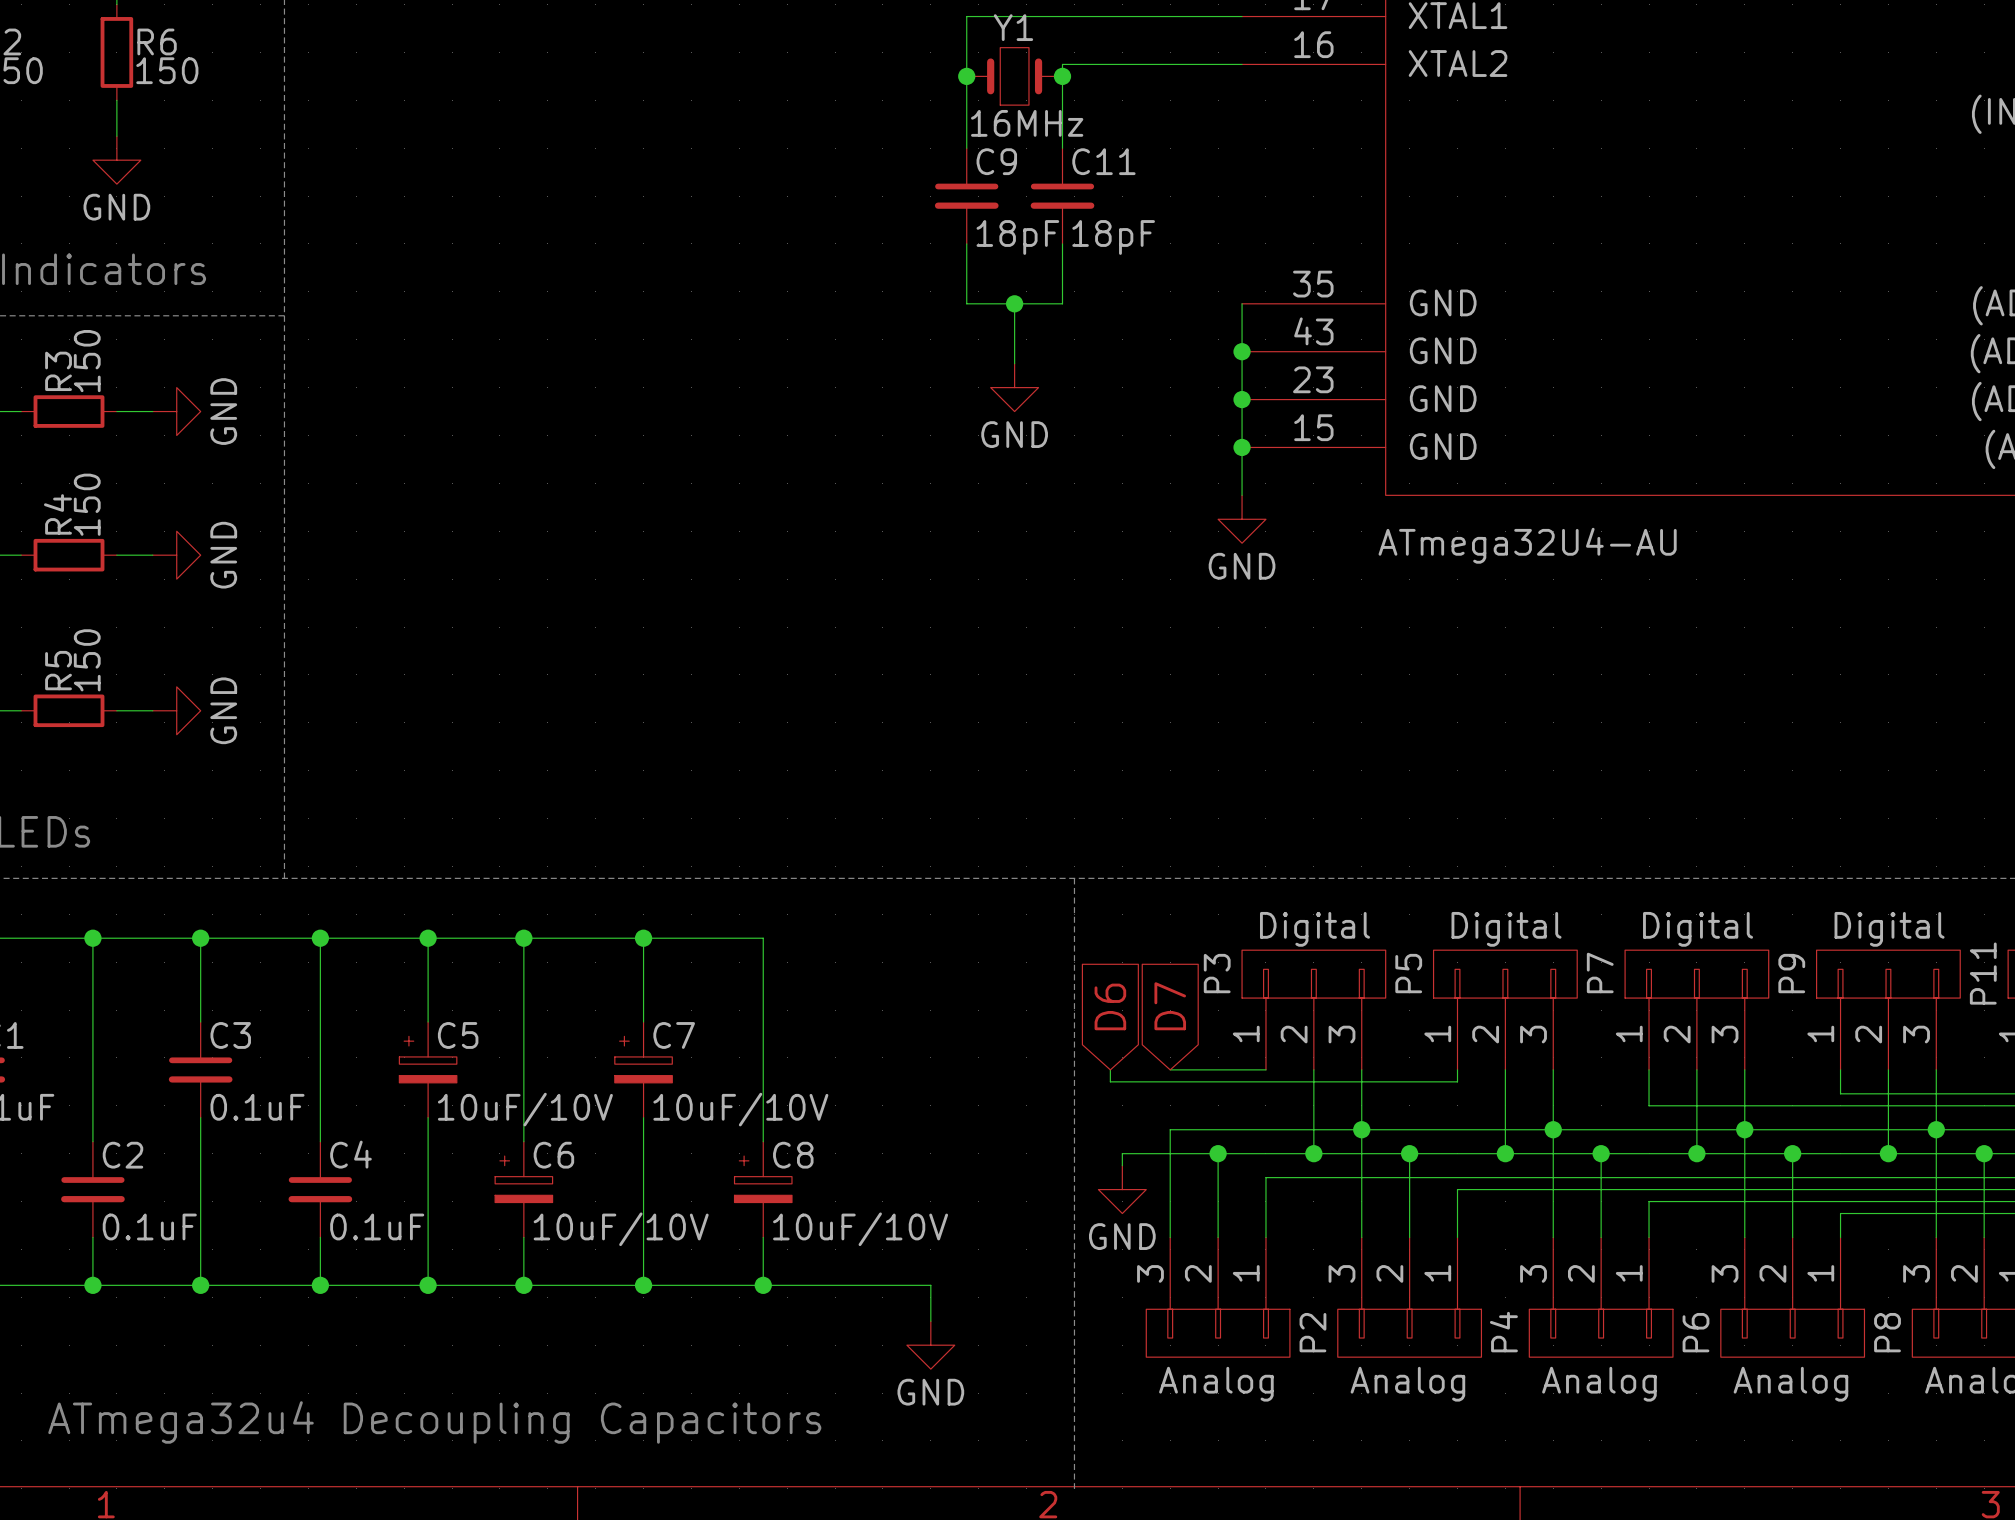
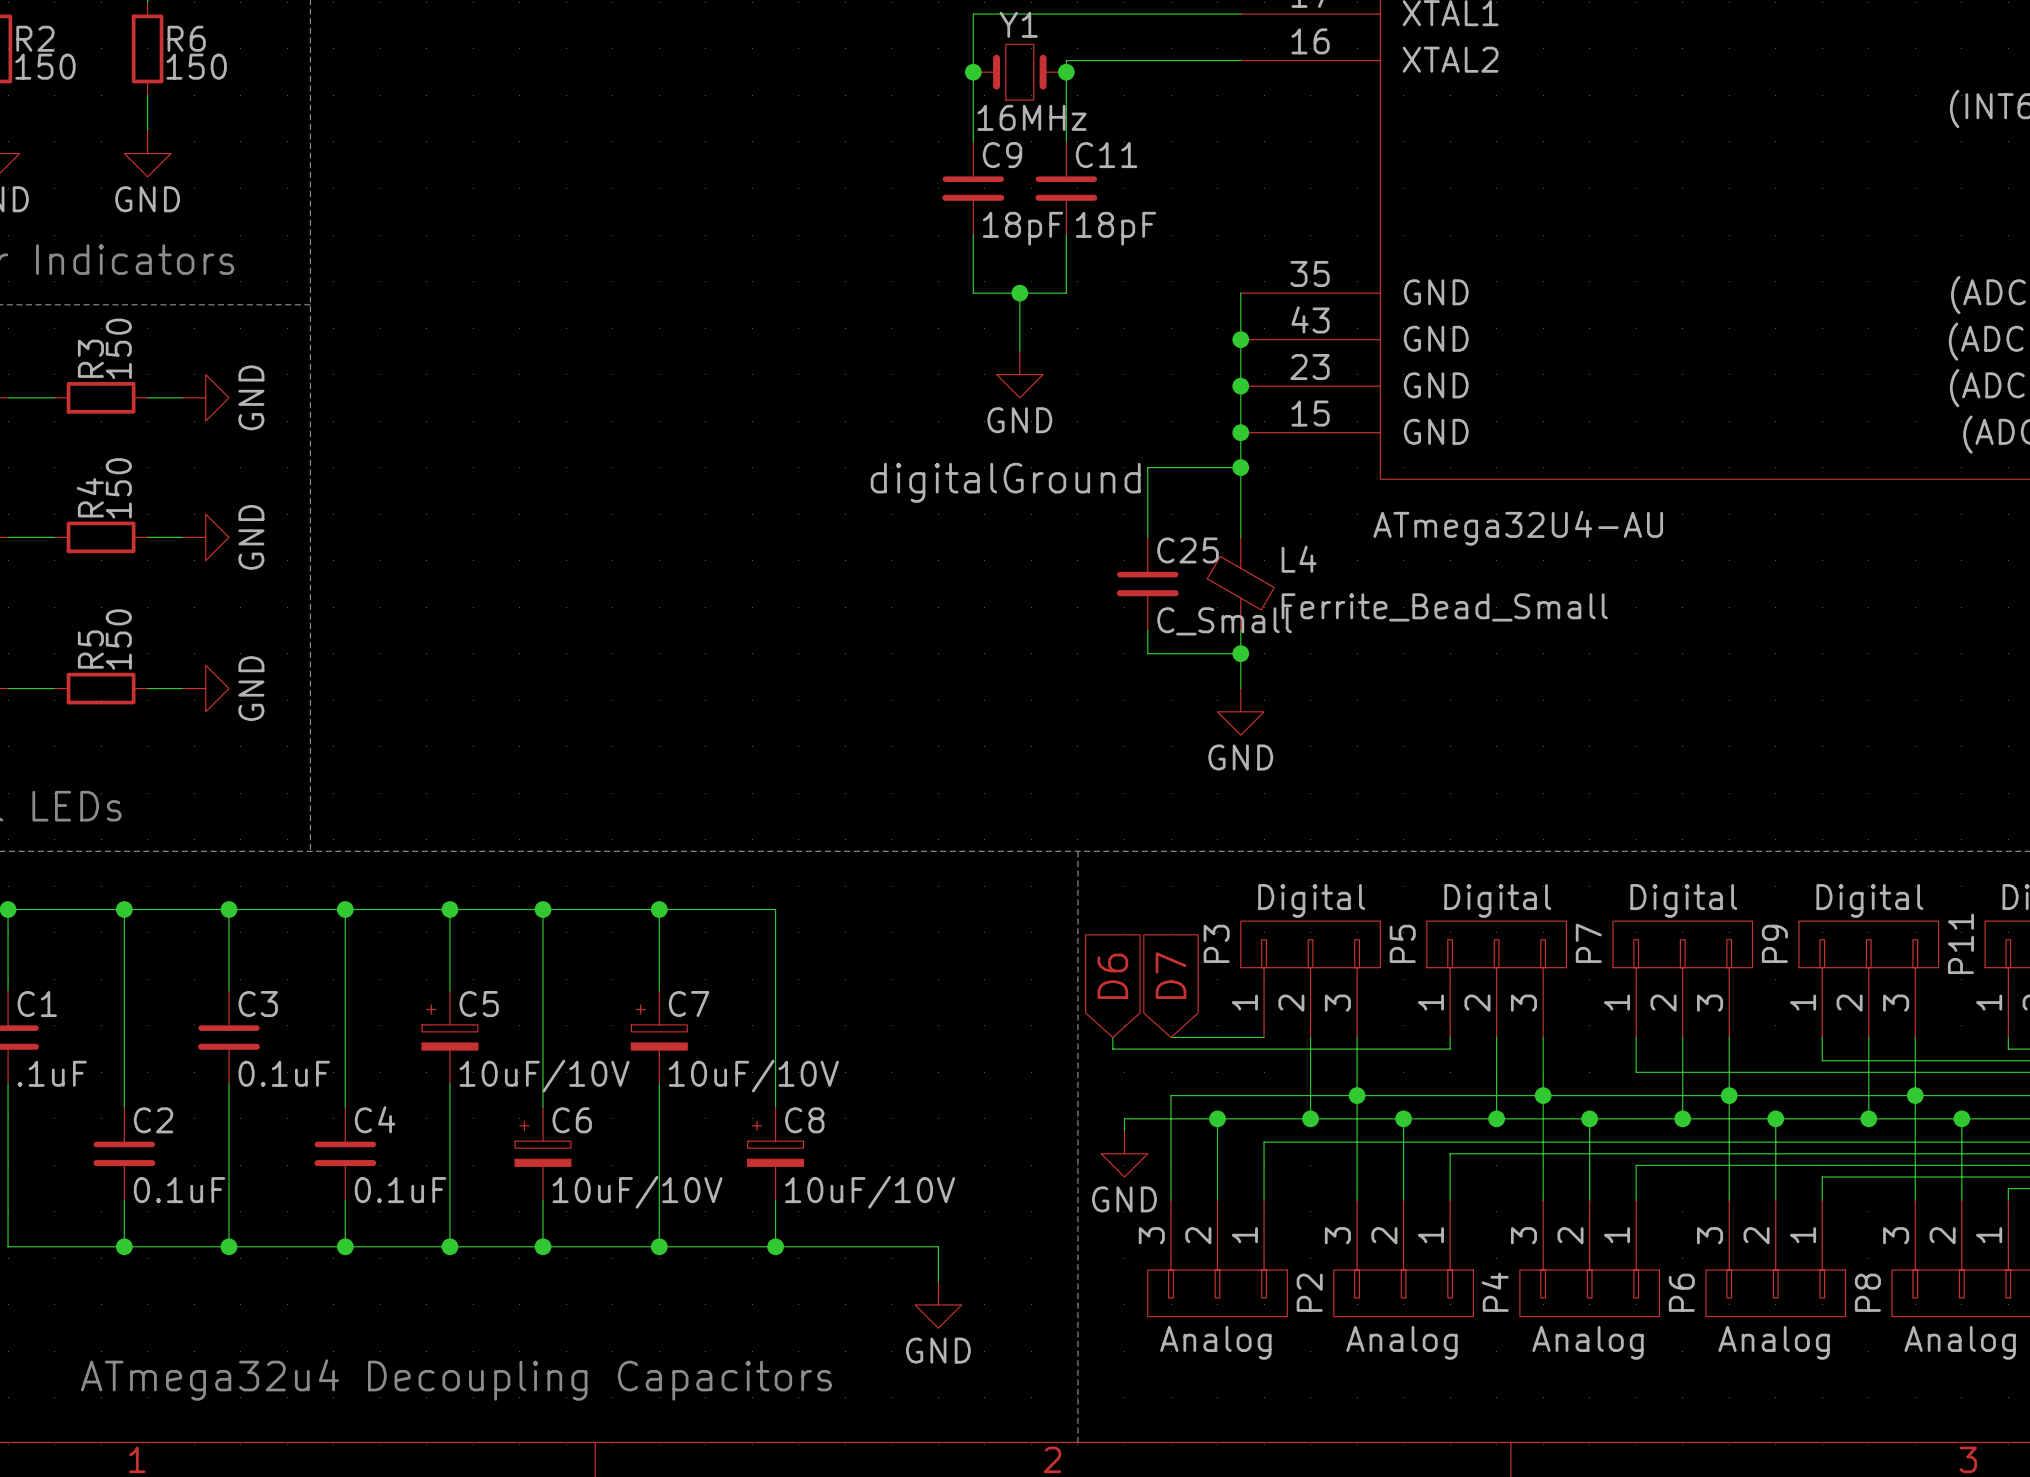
wire: none -> (1240, 467) (1147, 467) (1147, 537)
junction: none -> (1240, 467)
wire: none -> (1240, 479) (1240, 537)
label: none -> digitalGround (1005, 482)
power symbol position: GND (1242, 519) -> GND (1240, 711)
C25: none -> C_Small (1147, 583)
L4: none -> Ferrite_Bead_Small (1240, 583)
wire: none -> (1147, 630) (1147, 653) (1240, 653)
wire: none -> (1240, 630) (1240, 688)
junction: none -> (1240, 653)

